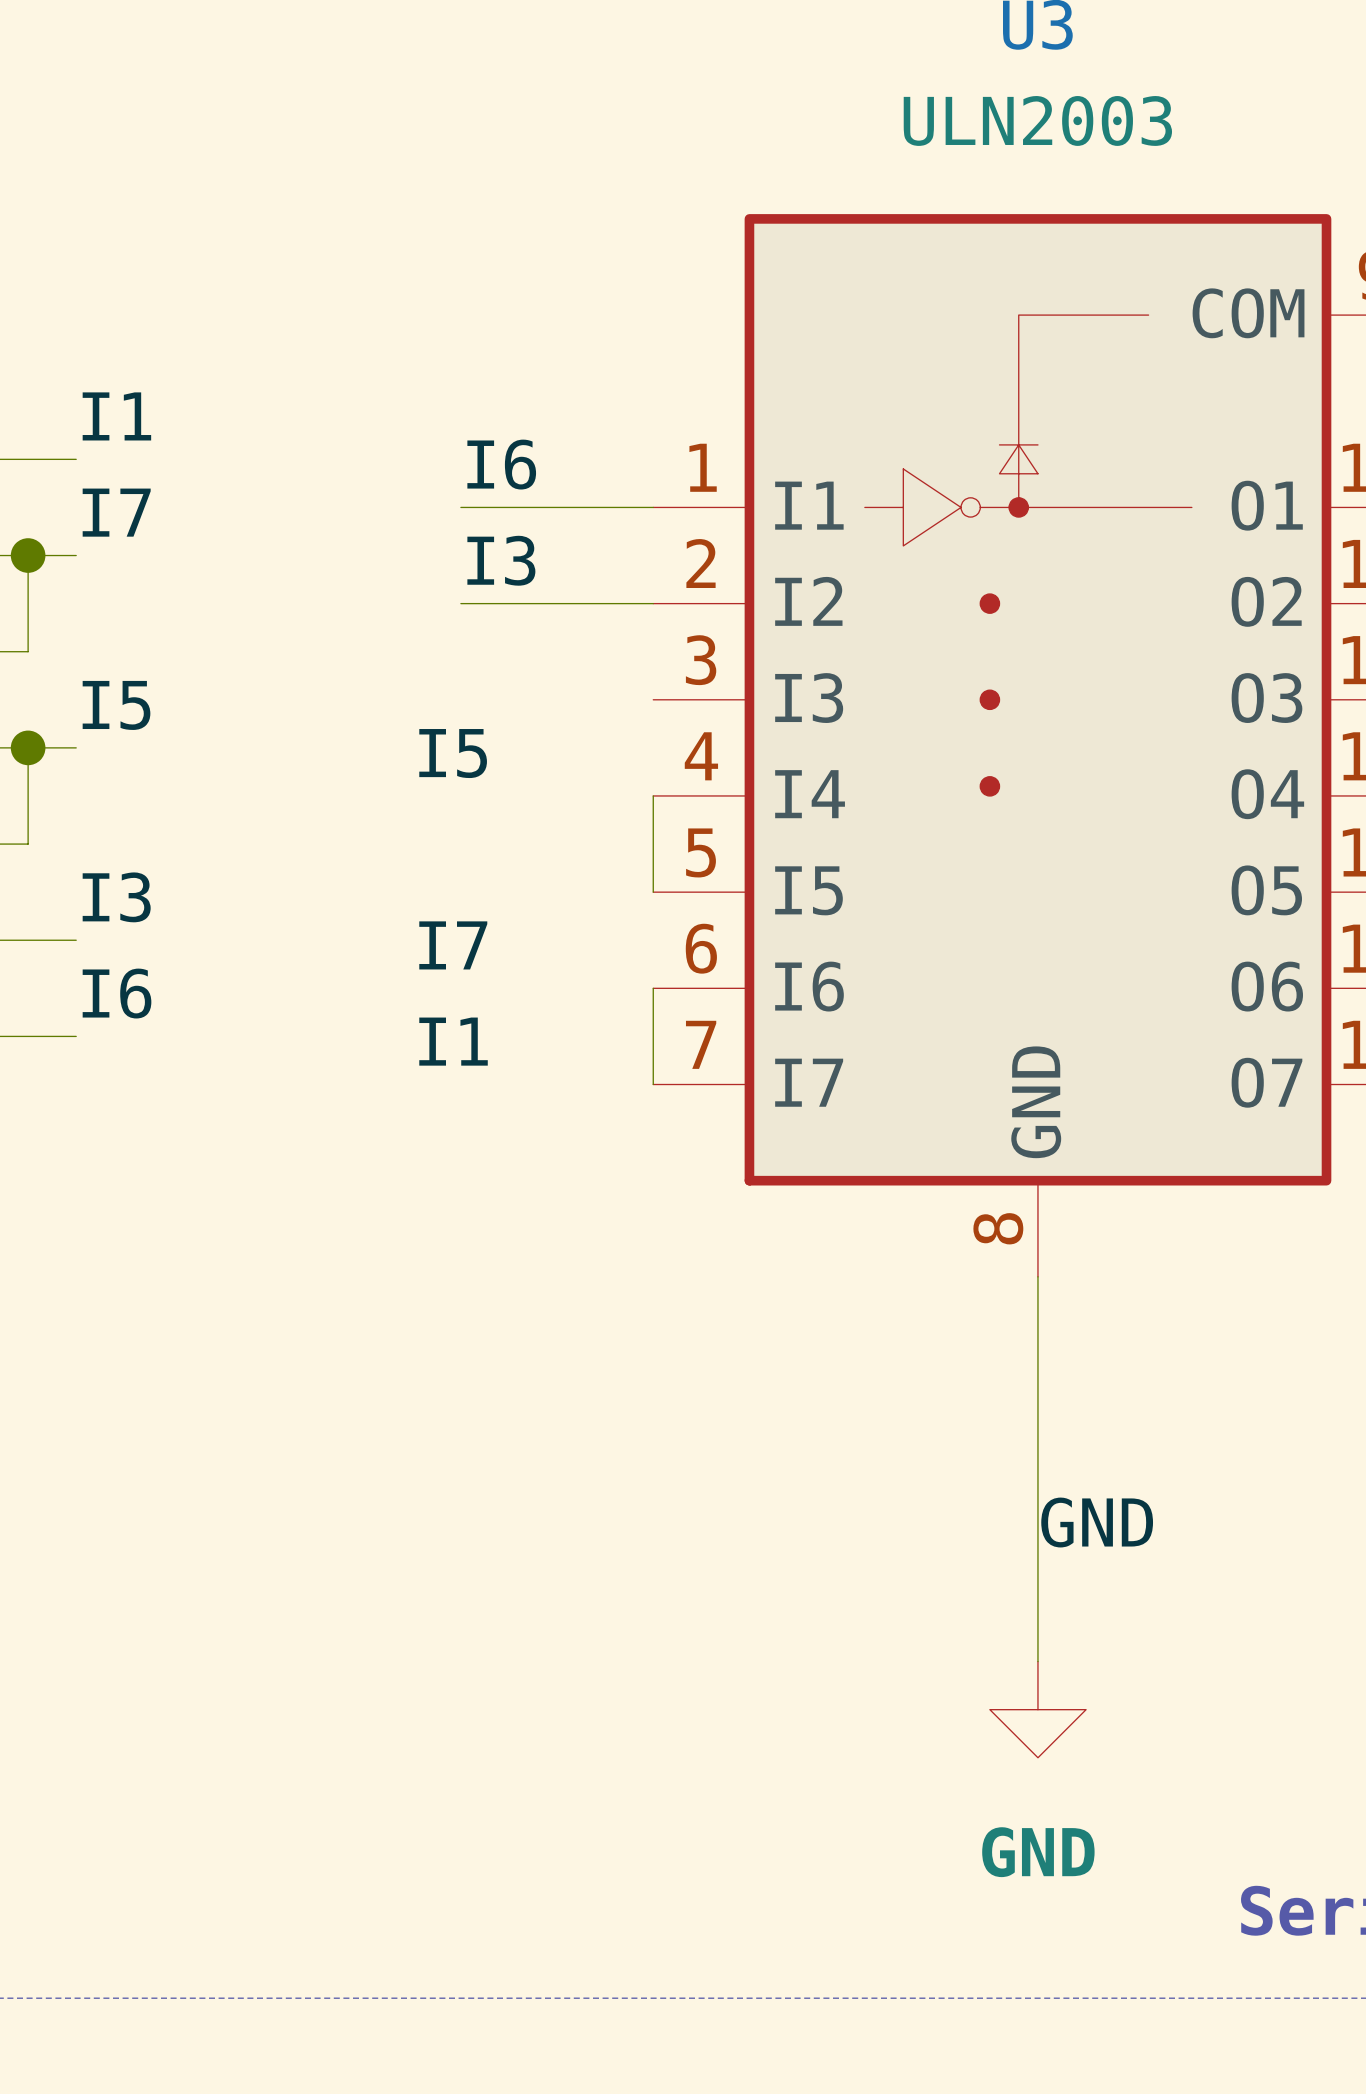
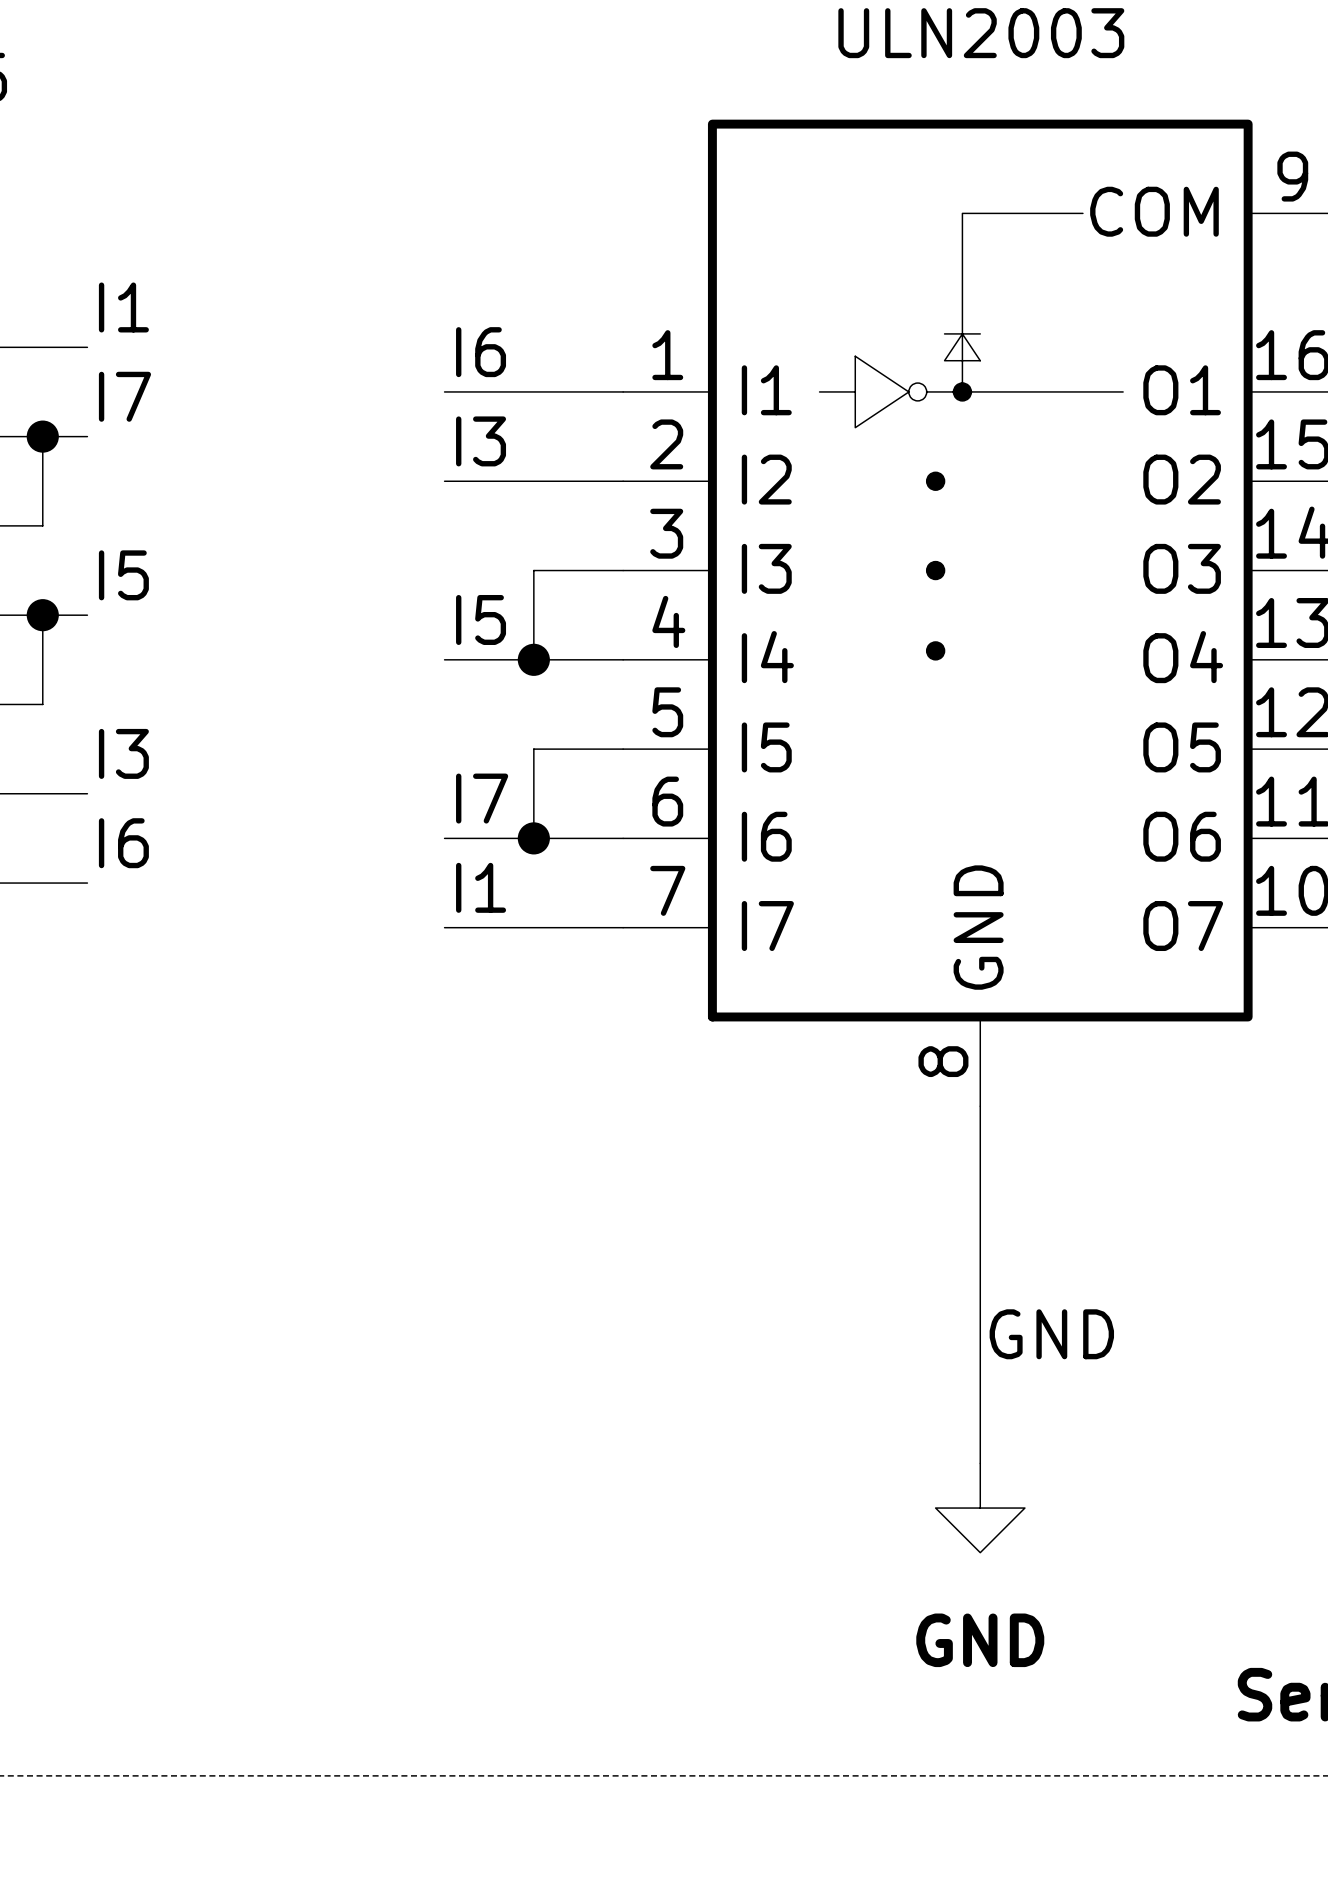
wire: none -> (623, 570) (533, 570) (533, 659)
label position: I5 (453, 753) -> I5 (481, 619)
junction: none -> (533, 659)
wire: (653, 795) (653, 892) -> (623, 659) (444, 659)
wire: none -> (623, 749) (533, 749) (533, 838)
label position: I7 (453, 945) -> I7 (482, 798)
junction: none -> (533, 838)
wire: (653, 988) (653, 1084) -> (623, 838) (444, 838)
label position: I1 (453, 1041) -> I1 (481, 887)
wire: none -> (444, 927) (623, 927)

